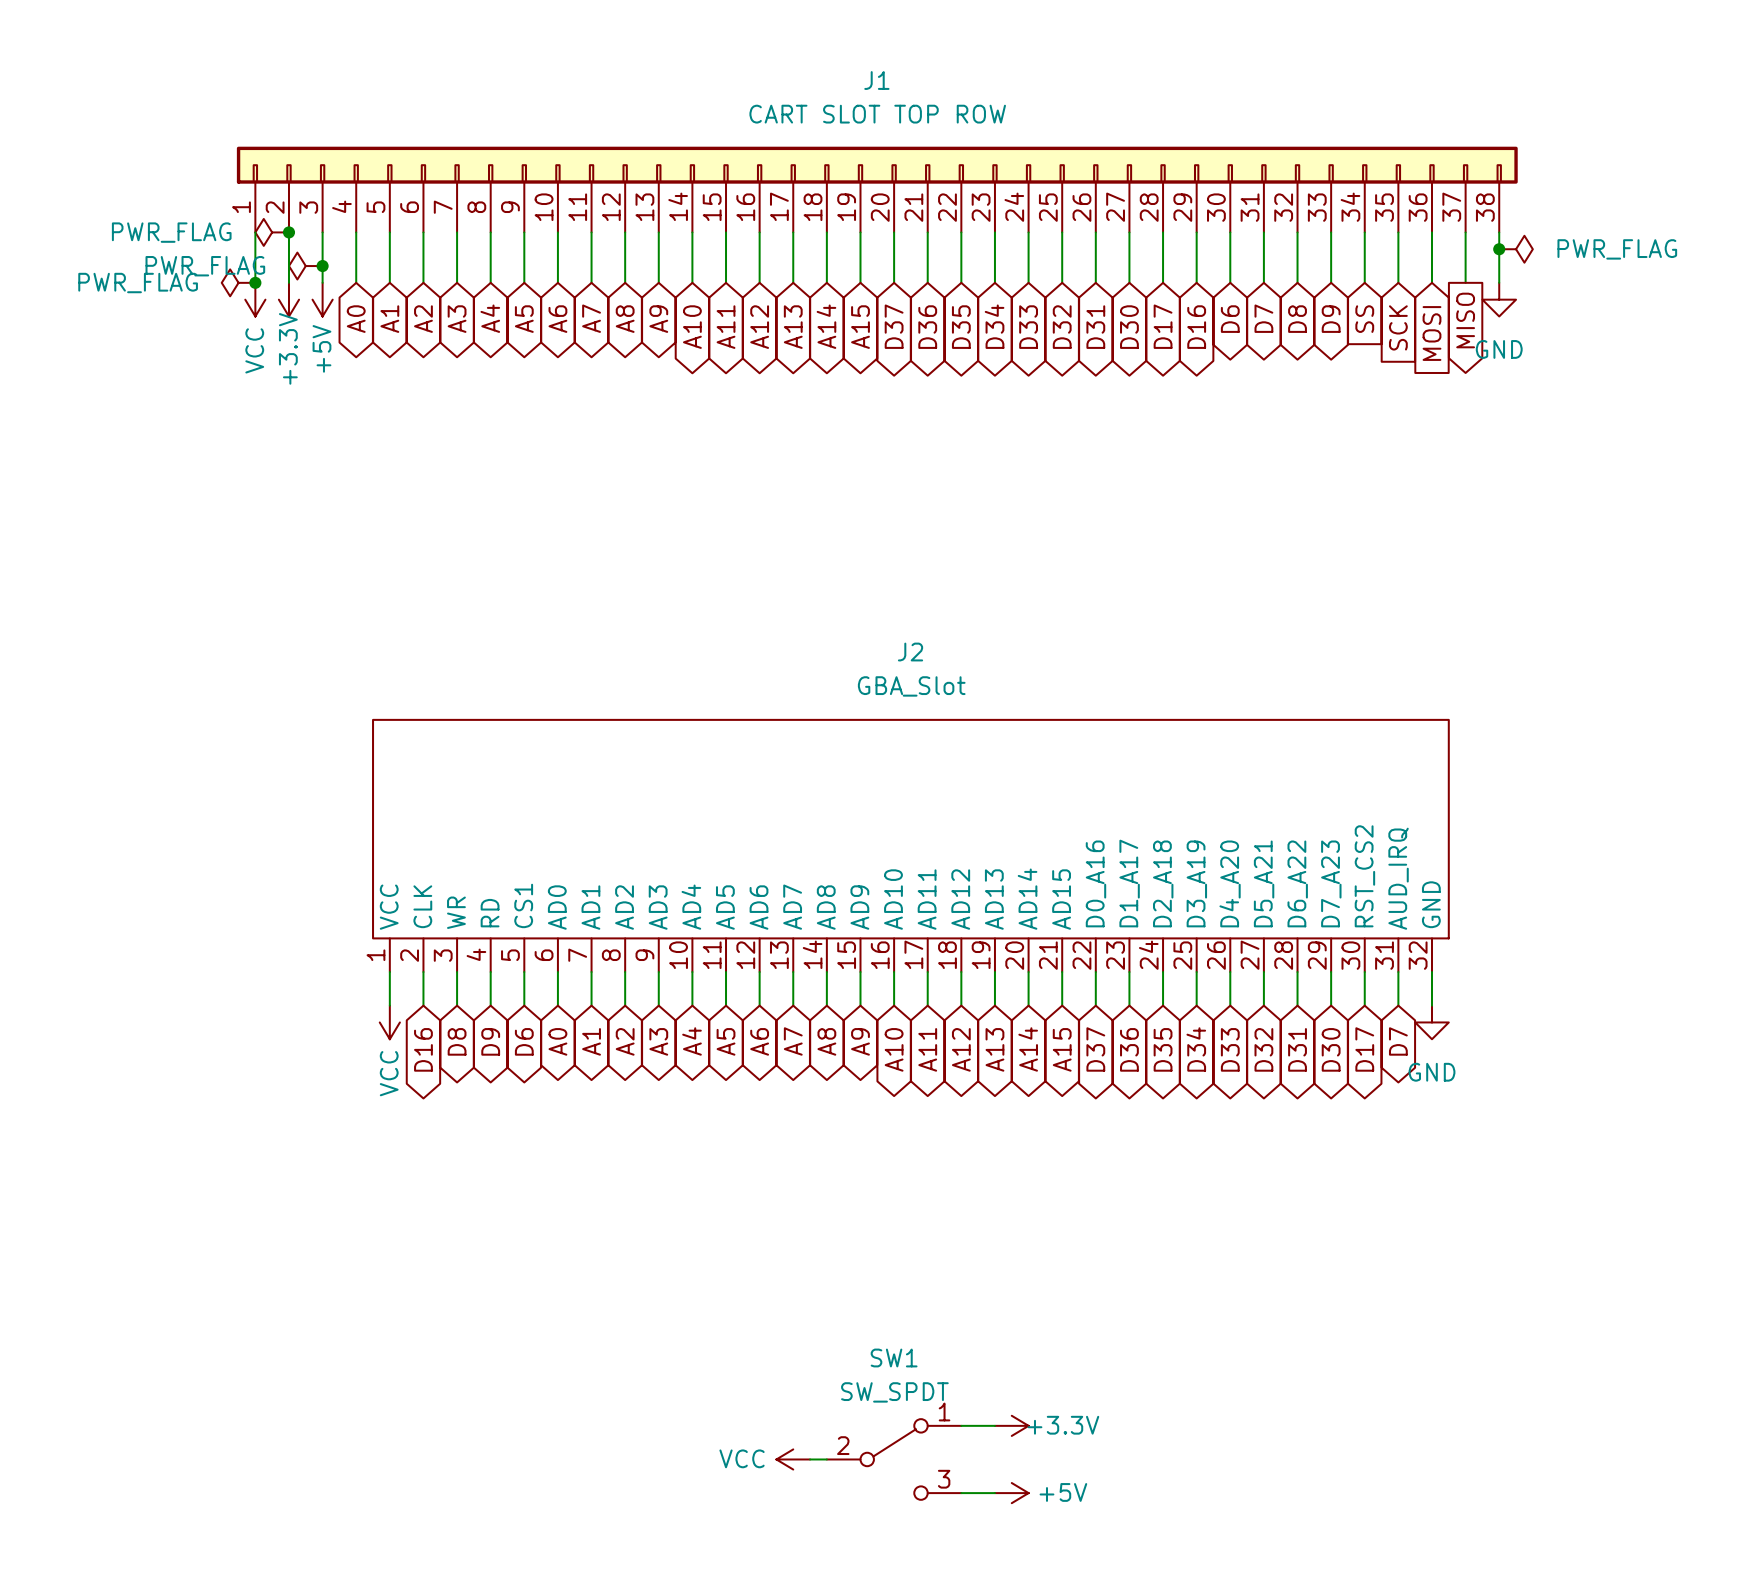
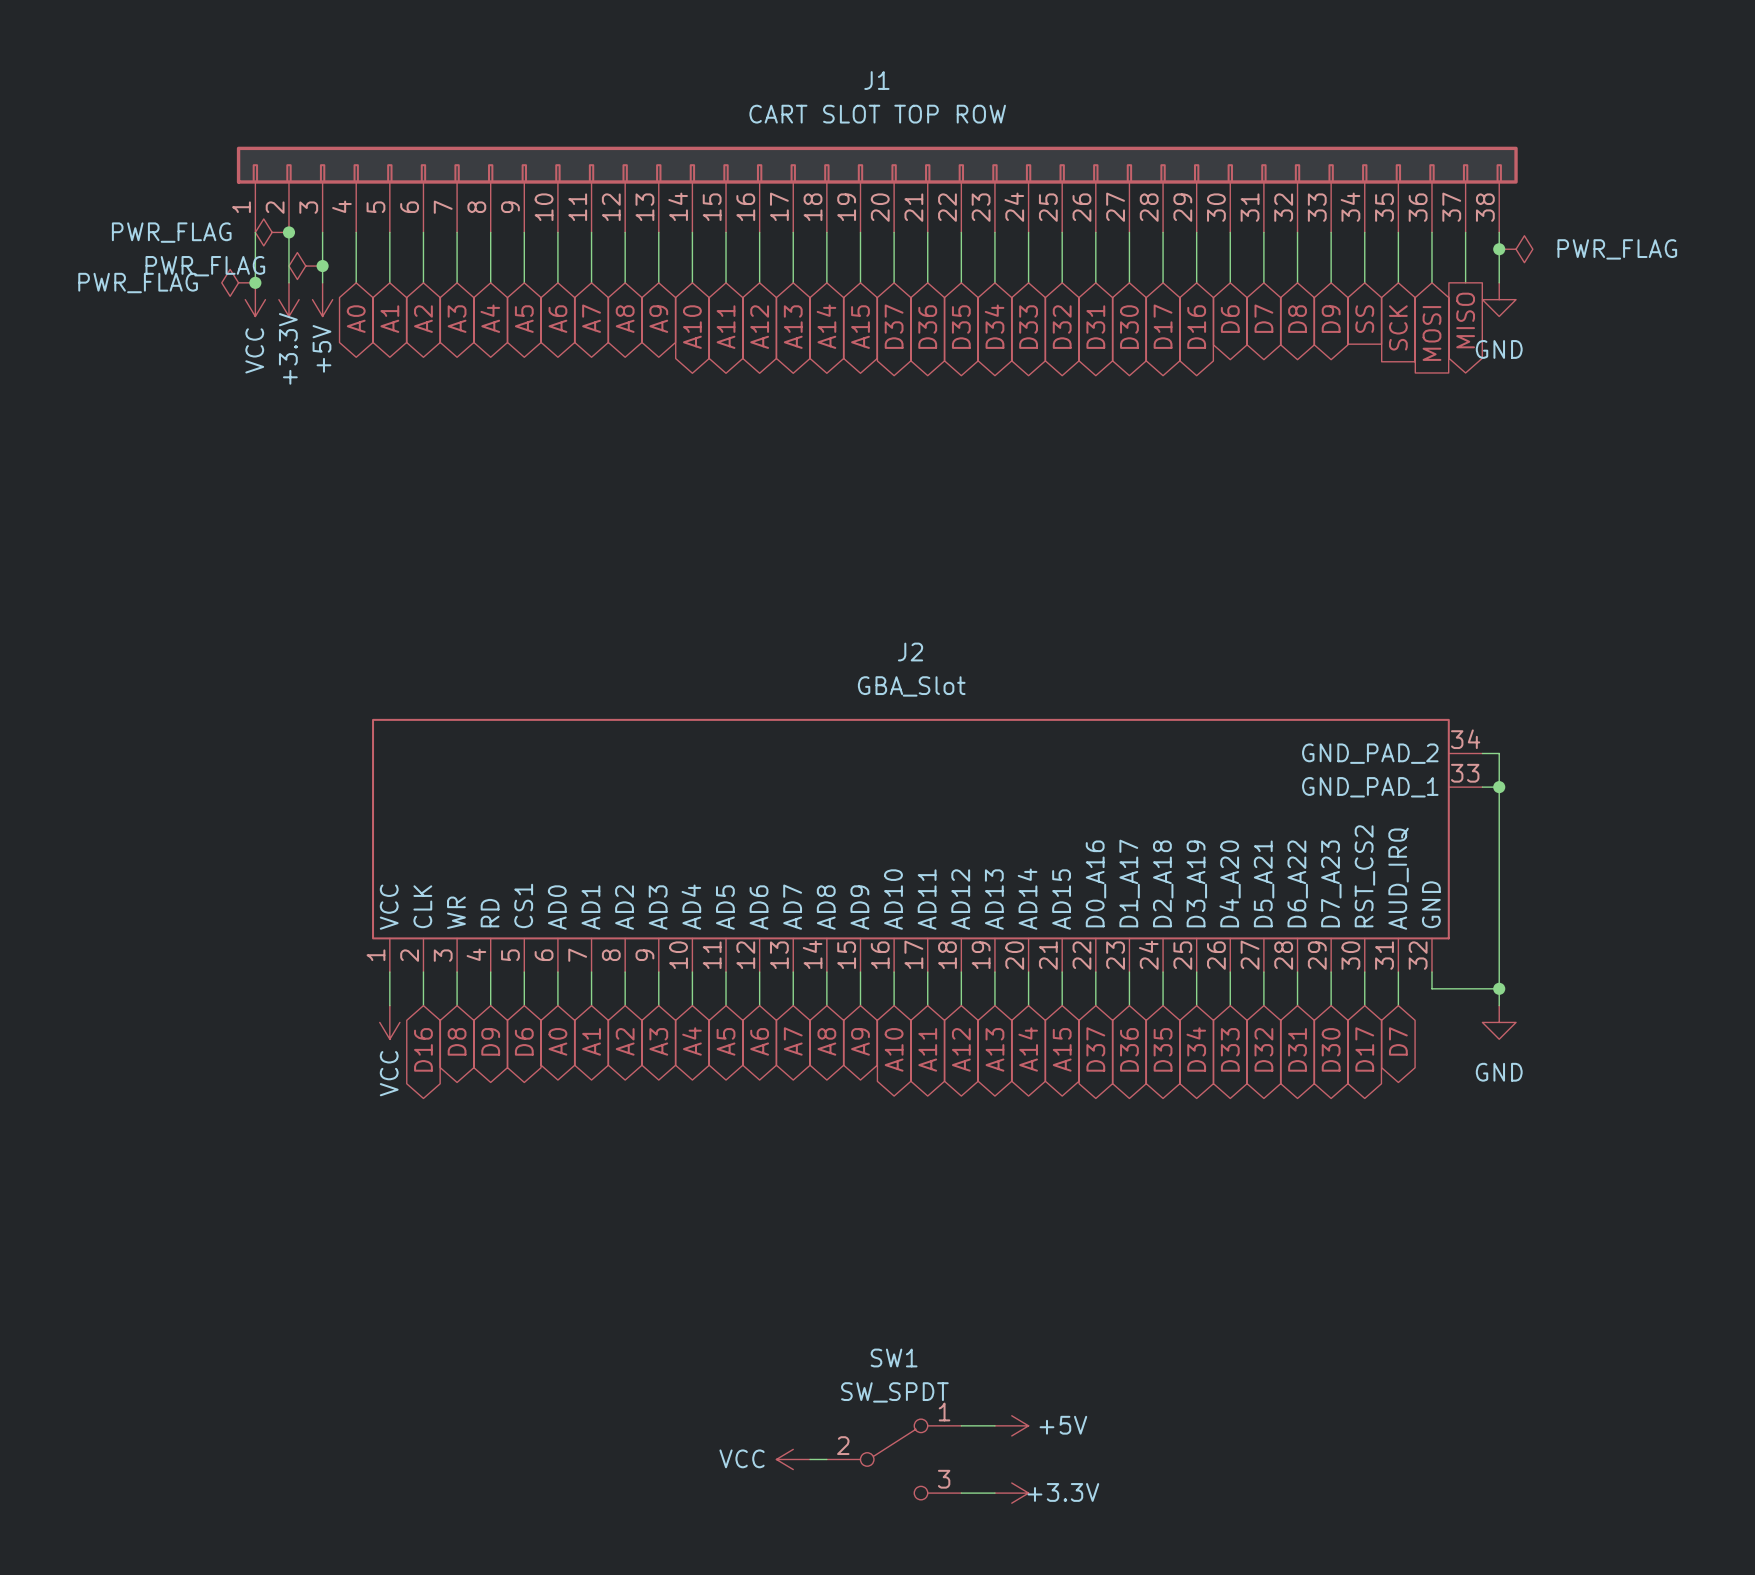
J2 symbol: [372, 718, 1450, 973] -> [372, 718, 1483, 973]
wire: none -> (1482, 753) (1499, 753) (1499, 1005)
wire: none -> (1482, 787) (1499, 787)
junction: none -> (1499, 787)
wire: (1431, 988) (1431, 1005) -> (1431, 988) (1499, 988)
junction: none -> (1499, 988)
power symbol position: GND (1431, 1022) -> GND (1499, 1022)
power symbol: +3.3V (1011, 1425) -> +5V (1011, 1425)
power symbol: +5V (1011, 1493) -> +3.3V (1011, 1493)

